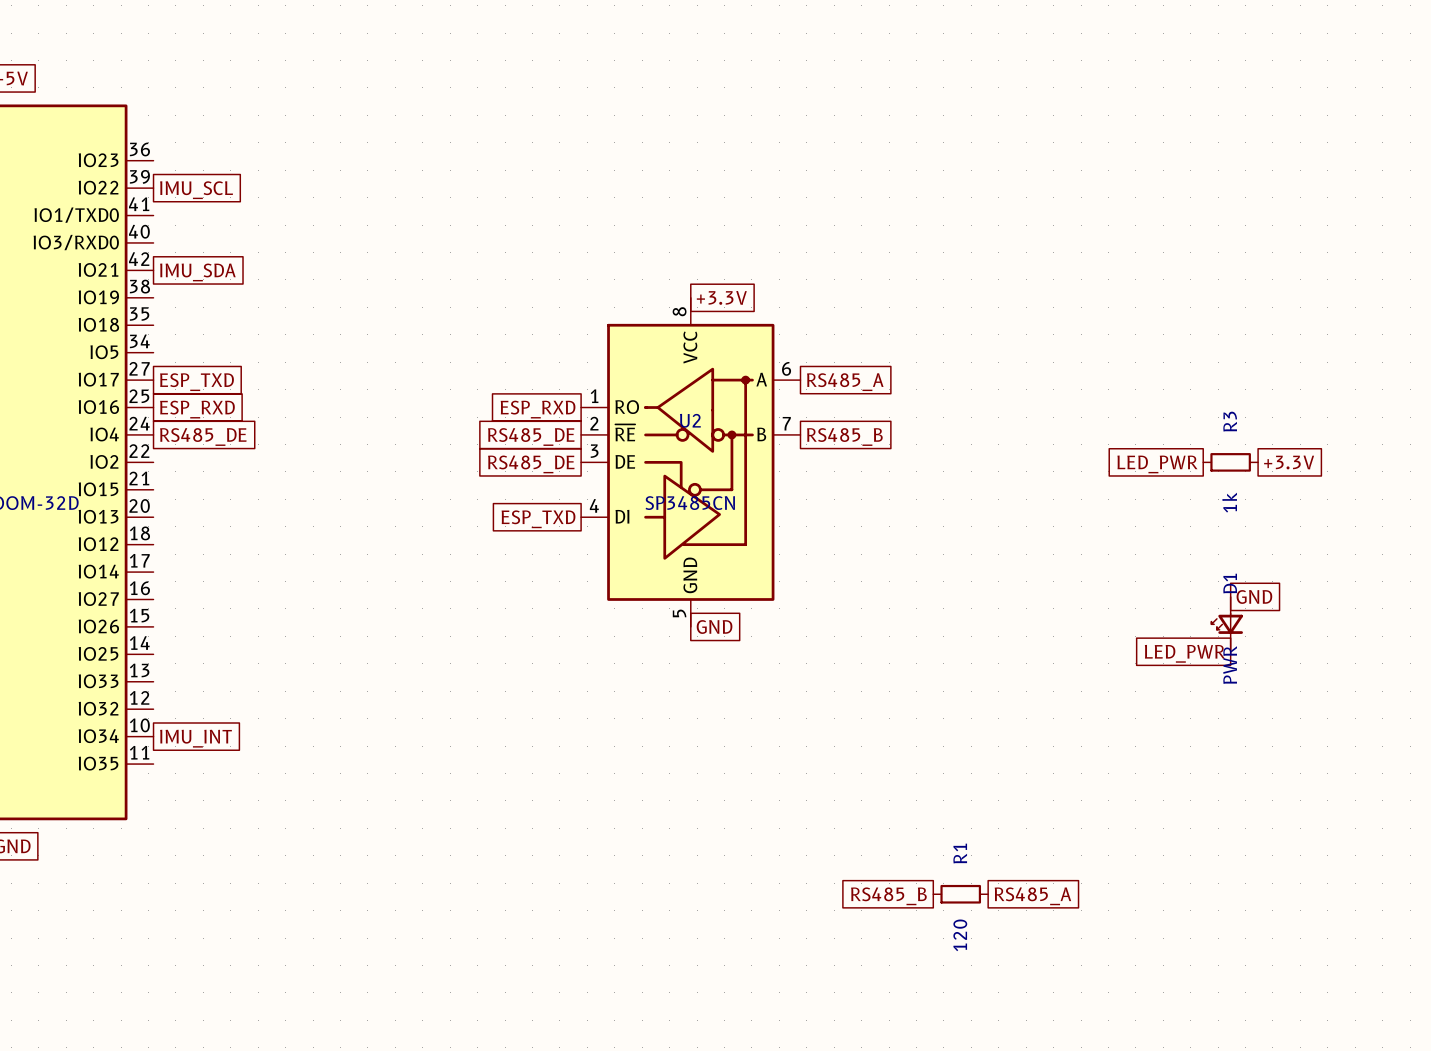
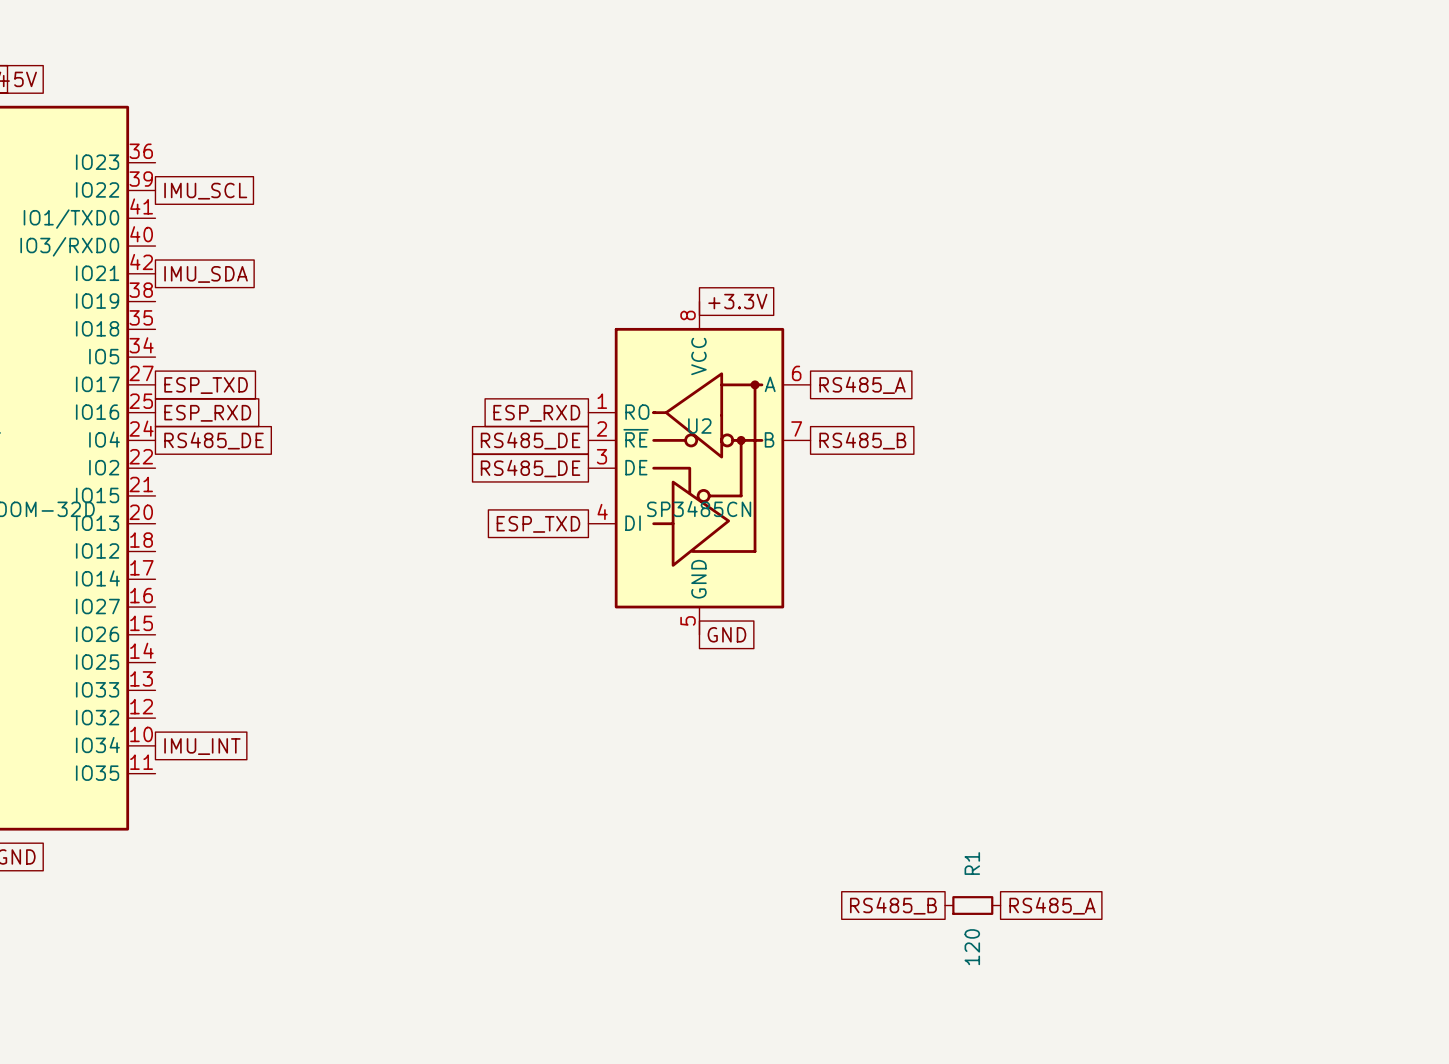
R3: 1k (1230, 462) -> none
global label: +3.3V (1289, 462) -> none
global label: LED_PWR (1157, 464) -> none
global label: GND (1254, 596) -> none
D1: PWR (1227, 624) -> none
global label: LED_PWR (1184, 653) -> none

